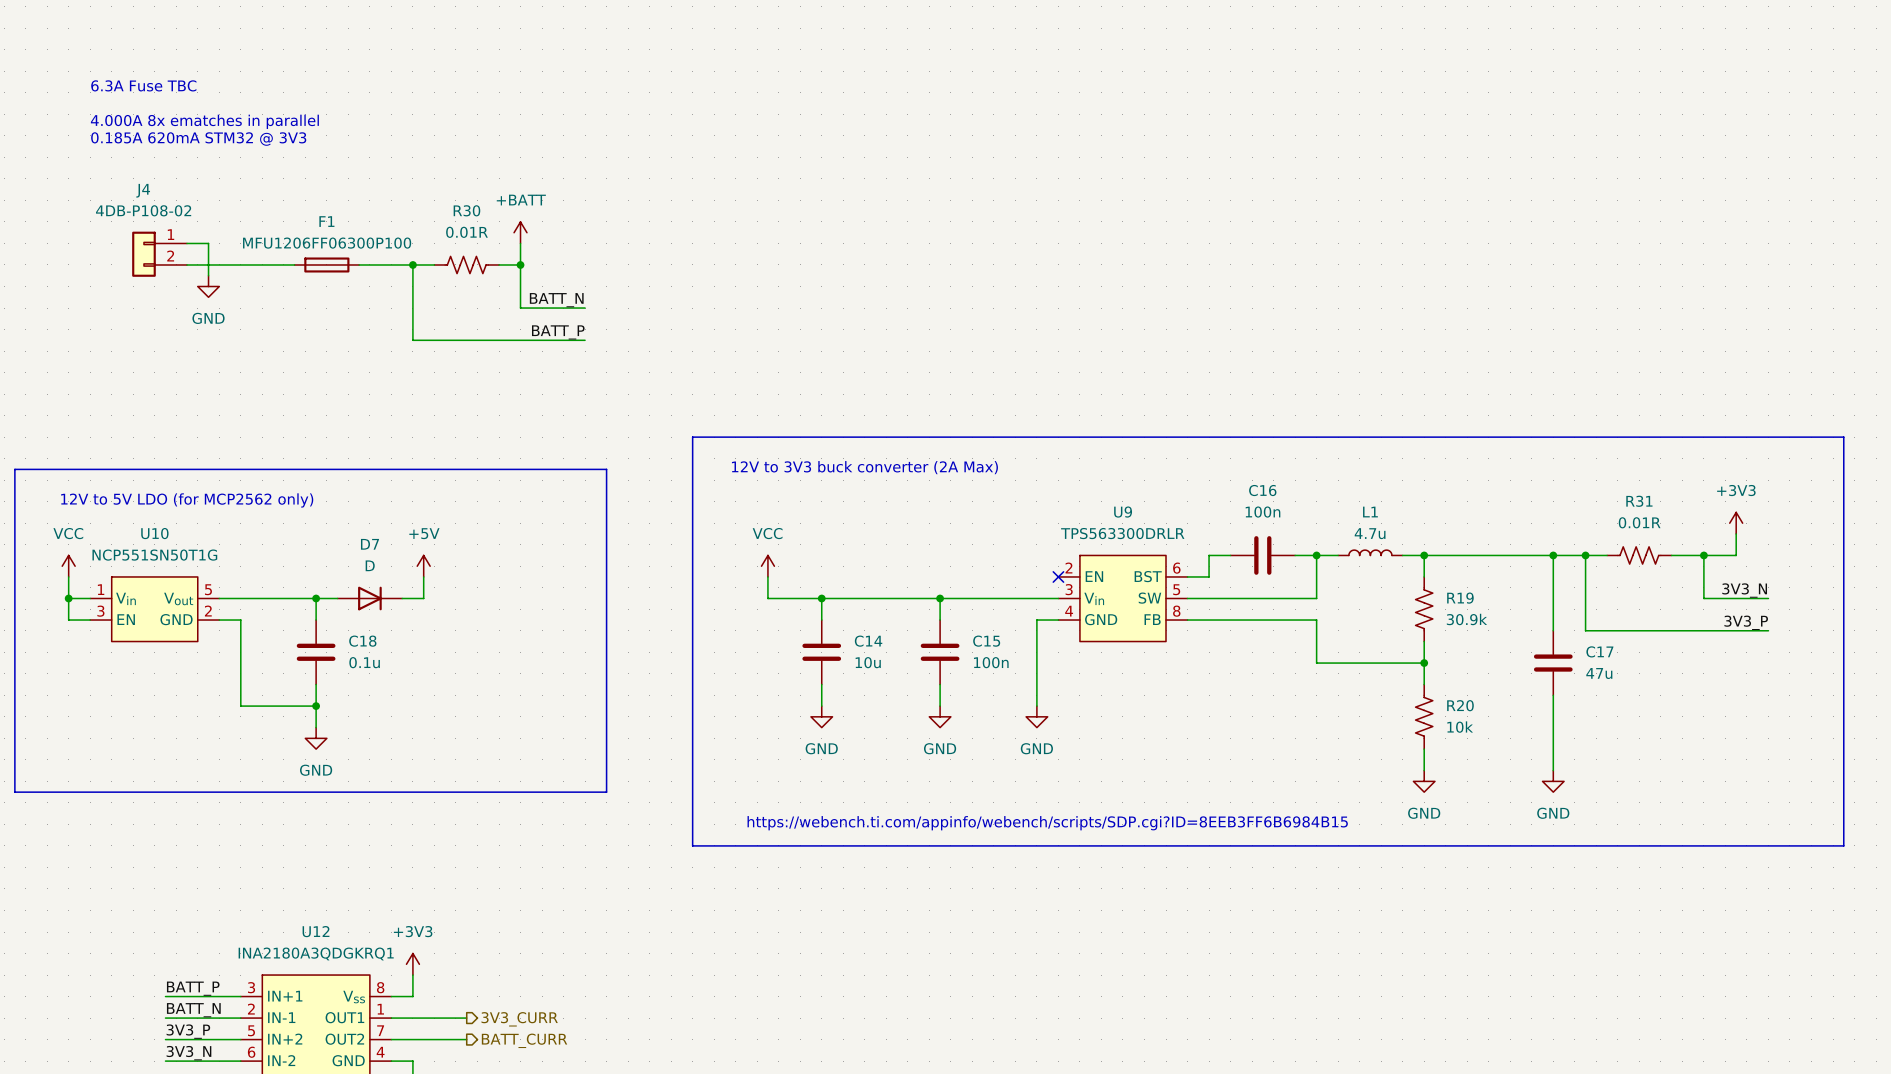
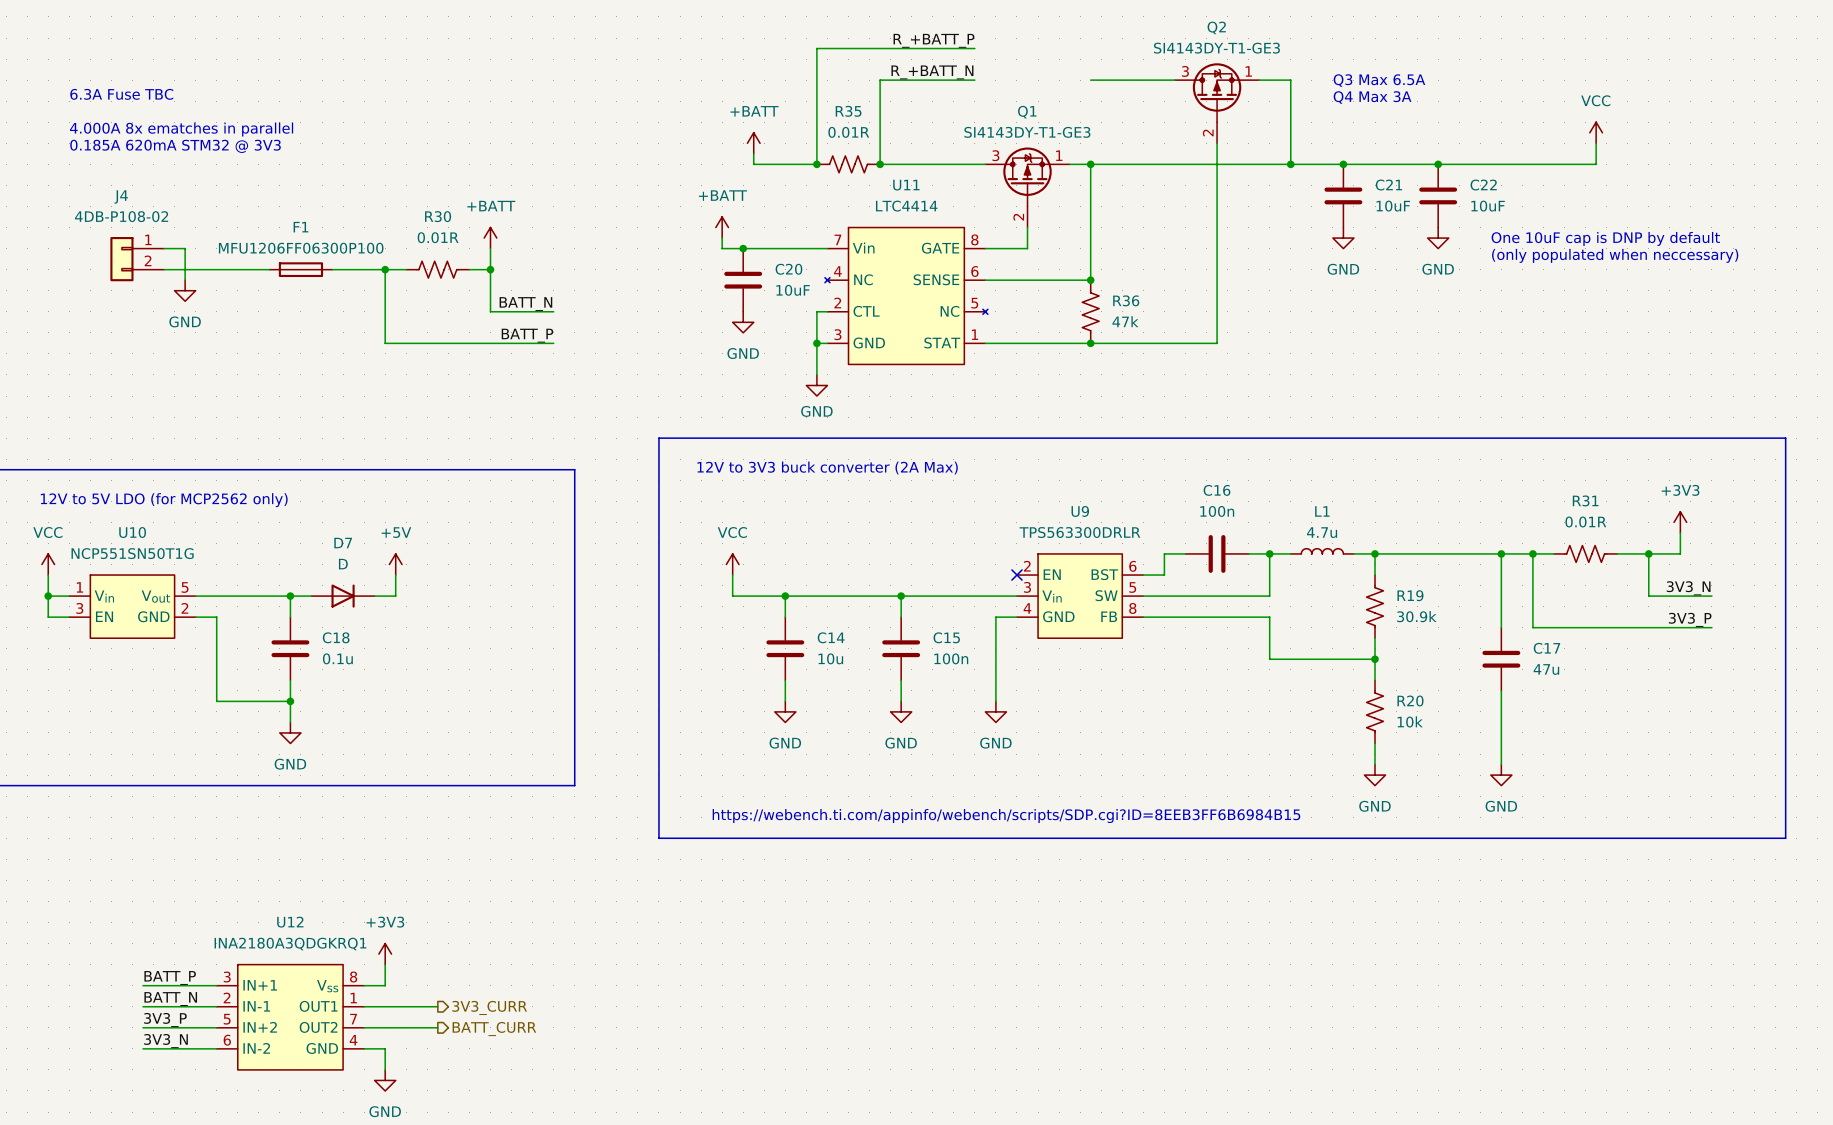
label: none -> R_+BATT_P (933, 40)
wire: none -> (974, 48) (816, 48) (816, 164) (753, 164) (753, 153)
label: none -> R_+BATT_N (932, 72)
wire: none -> (974, 80) (880, 80) (880, 164) (985, 164)
wire: none -> (1090, 80) (1174, 80)
wire: none -> (1259, 80) (1290, 80) (1290, 164)
text: none -> Q3 Max 6.5A (1379, 80)
text: none -> Q4 Max 3A (1372, 97)
Q2: none -> SI4143DY-T1-GE3 (1217, 103)
power symbol: none -> VCC (1596, 132)
power symbol: none -> +BATT (753, 143)
wire: none -> (1217, 143) (1217, 343) (985, 343)
wire: none -> (1596, 143) (1596, 164) (1069, 164)
junction: none -> (816, 164)
R35: none -> 0.01R (848, 164)
junction: none -> (880, 164)
wire: none -> (1090, 164) (1090, 280) (985, 280)
junction: none -> (1090, 164)
junction: none -> (1290, 164)
junction: none -> (1343, 164)
junction: none -> (1438, 164)
Q1: none -> SI4143DY-T1-GE3 (1027, 187)
C21: none -> 10uF (1343, 195)
C22: none -> 10uF (1438, 195)
power symbol: none -> +BATT (722, 227)
wire: none -> (1027, 227) (1027, 248) (985, 248)
wire: none -> (722, 238) (722, 248) (827, 248)
power symbol: none -> GND (1343, 238)
power symbol: none -> GND (1438, 238)
text: none -> One 10uF cap is DNP by default (1605, 238)
junction: none -> (743, 248)
text: none -> (only populated when neccessary) (1615, 255)
C20: none -> 10uF (743, 280)
junction: none -> (1090, 280)
U11: none -> LTC4414 (906, 295)
wire: none -> (827, 311) (816, 311) (816, 374)
R36: none -> 47k (1090, 311)
power symbol: none -> GND (743, 322)
wire: none -> (816, 343) (827, 343)
junction: none -> (816, 343)
junction: none -> (1090, 343)
power symbol: none -> GND (816, 385)

